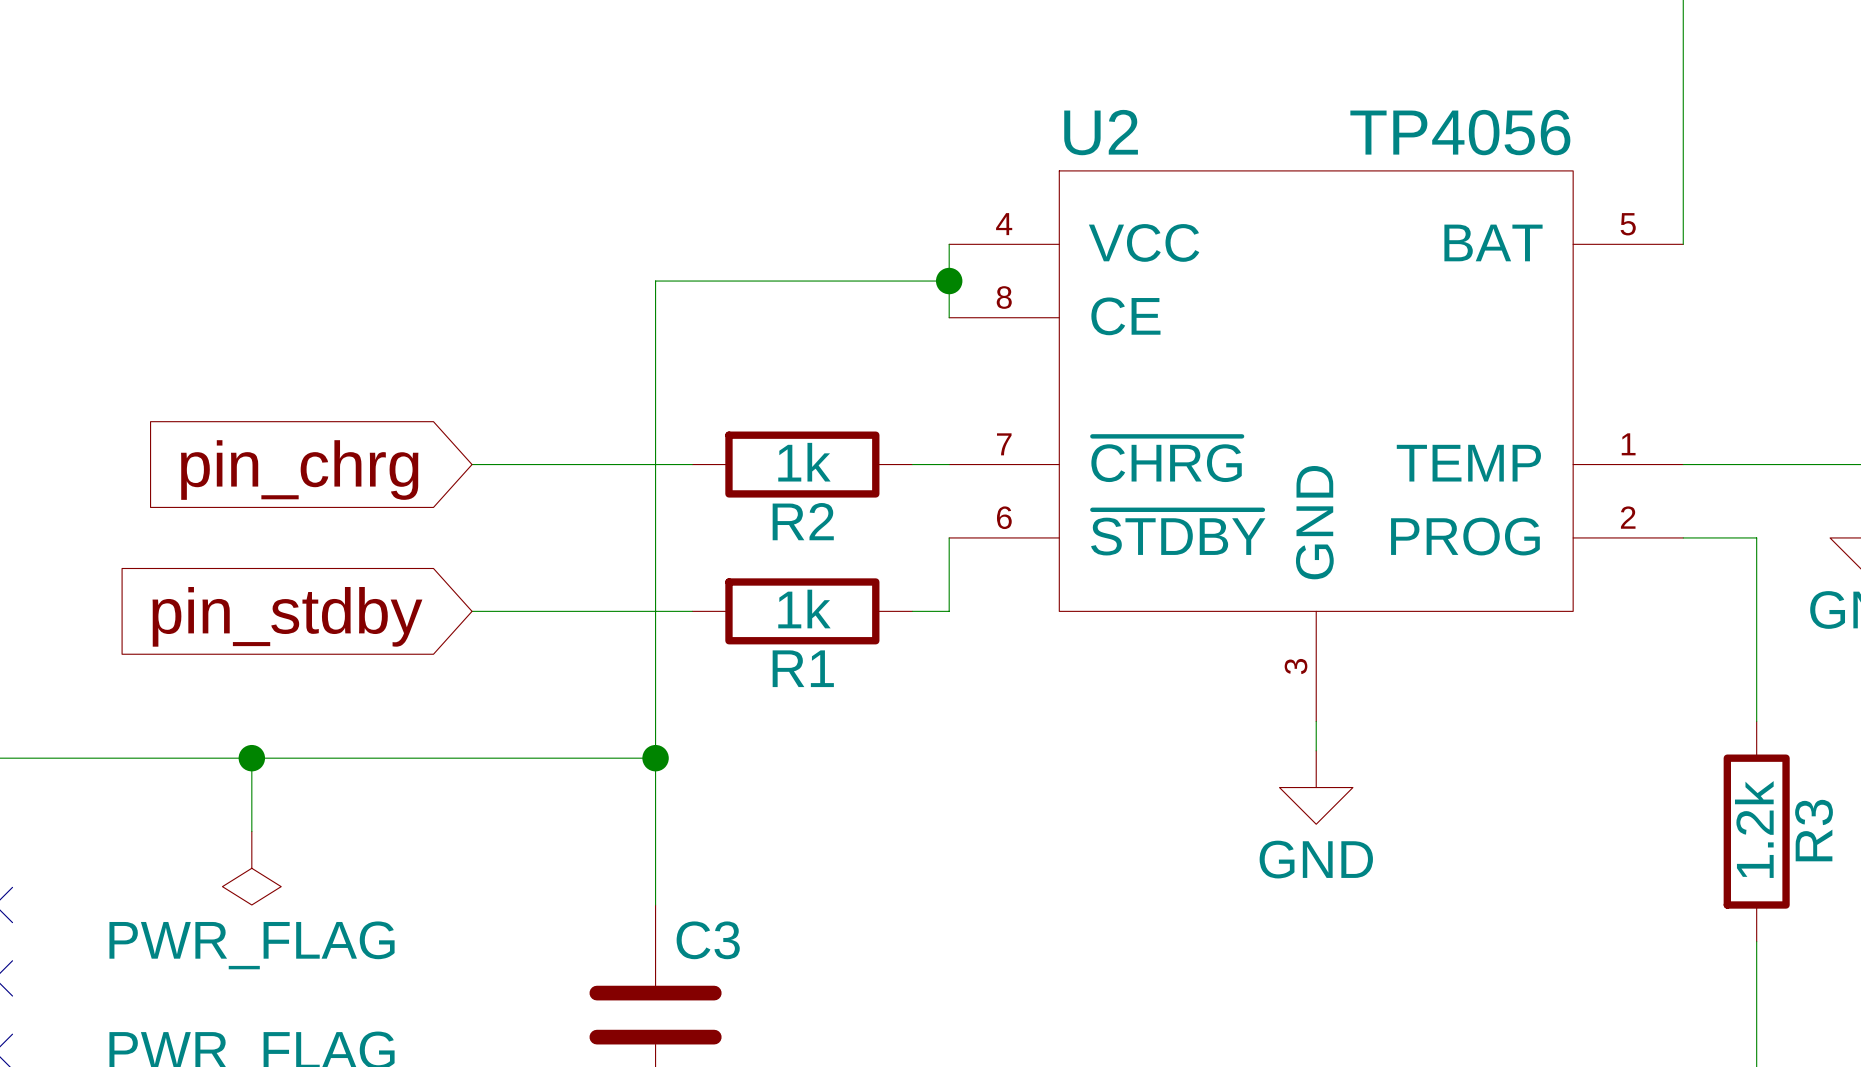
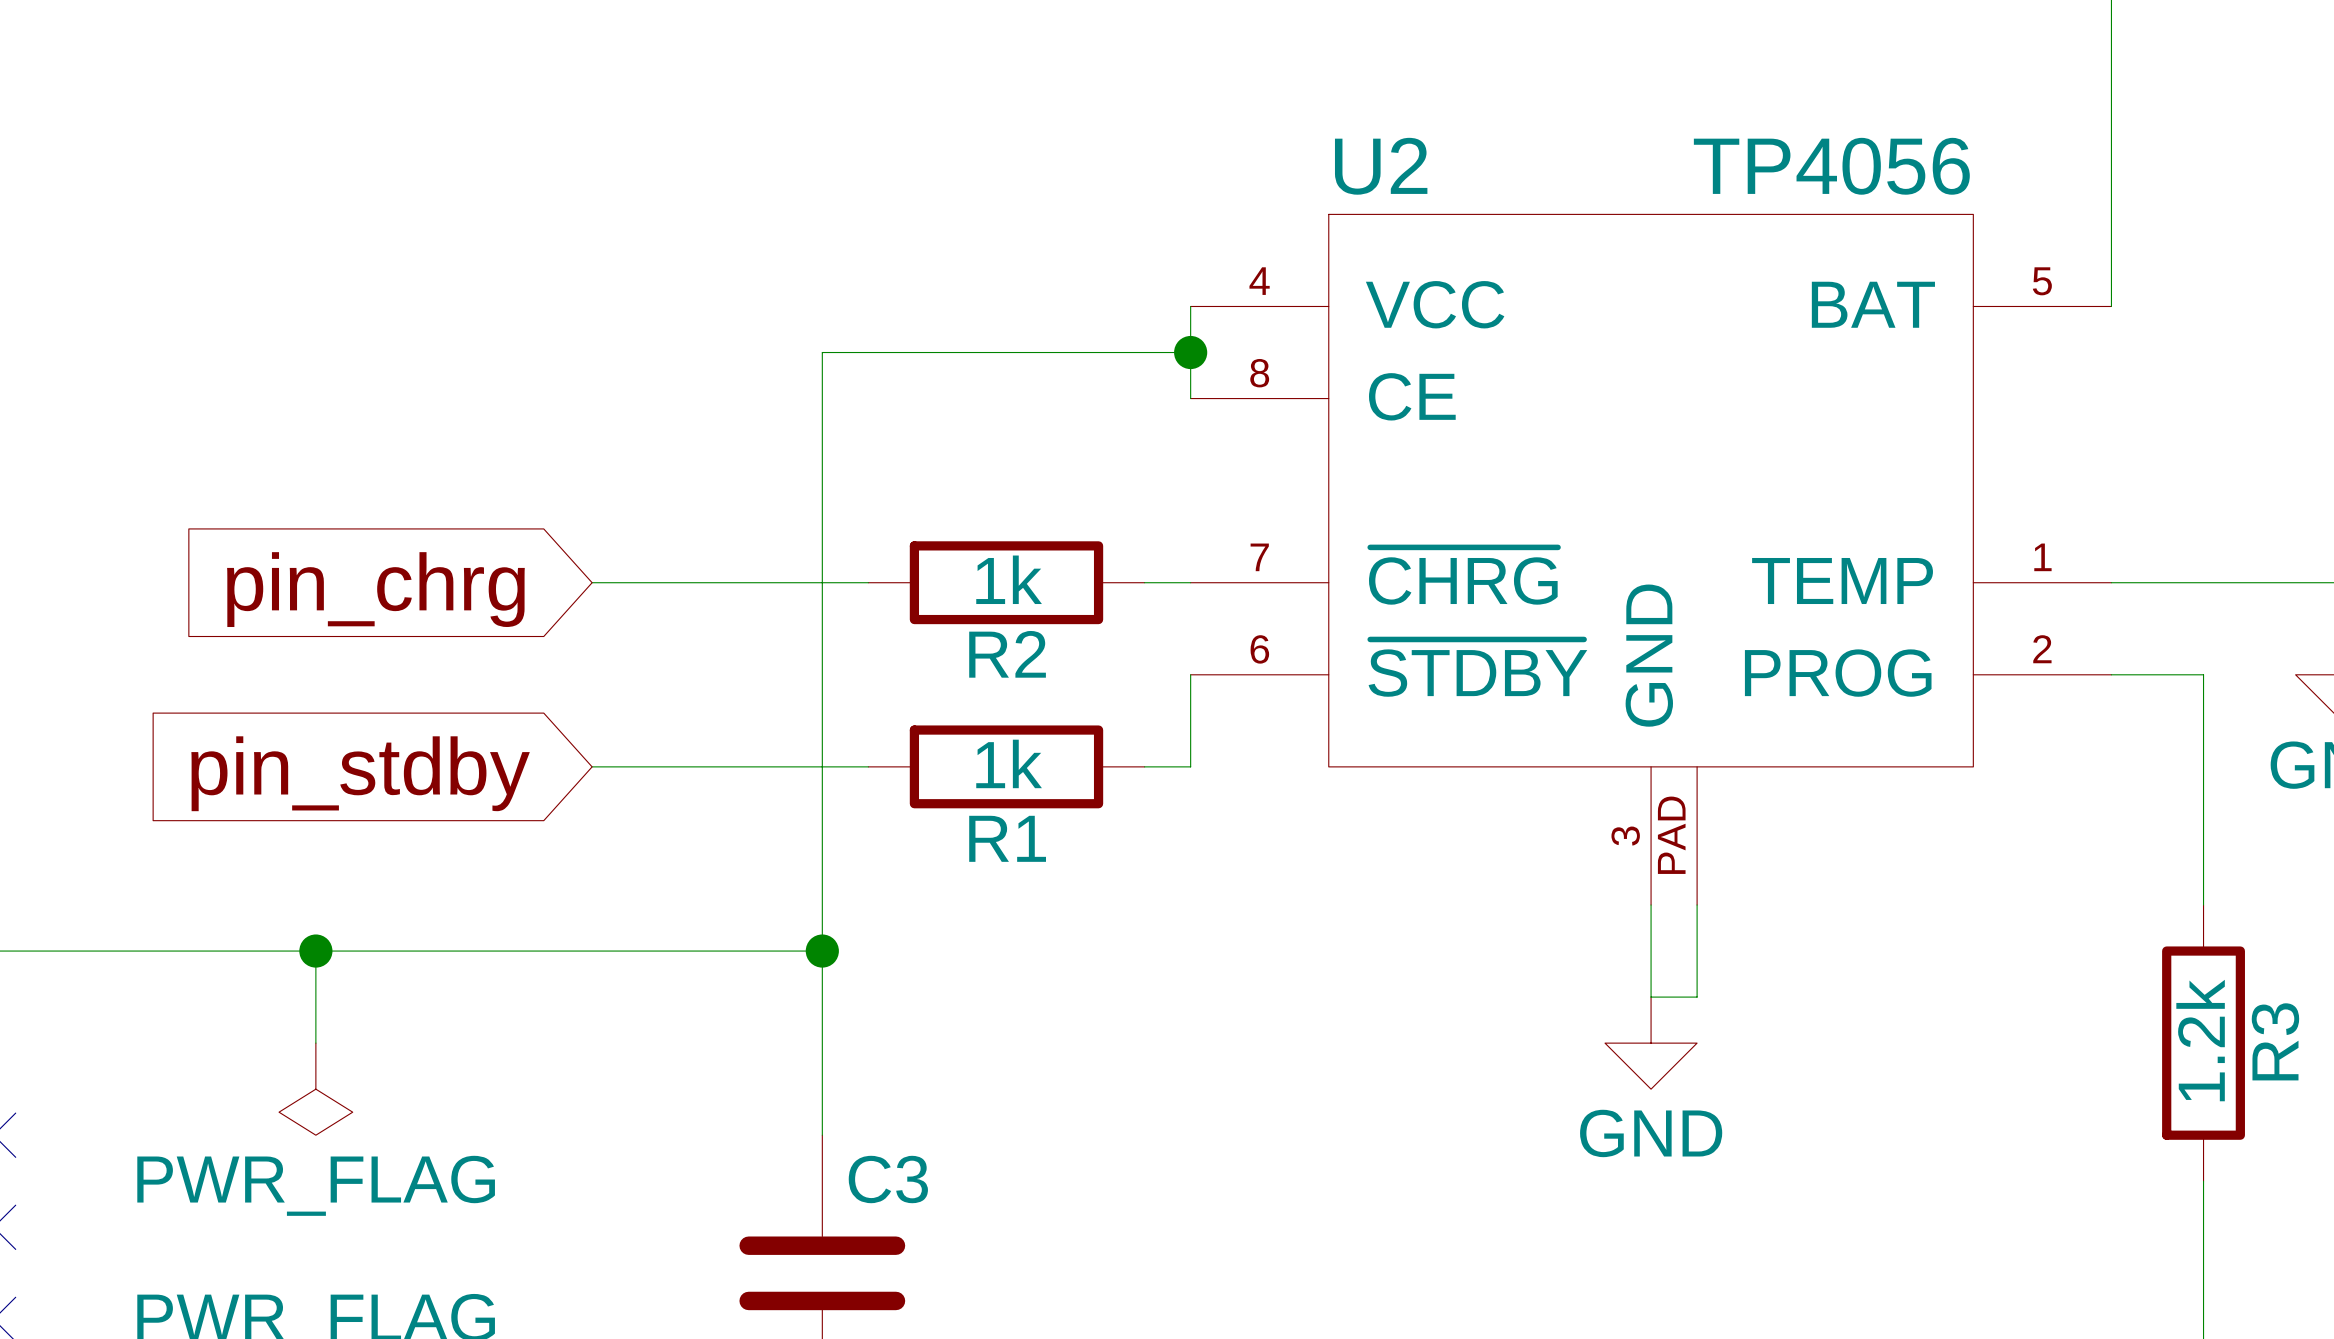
U2 symbol: [949, 170, 1684, 722] -> [1190, 214, 2112, 906]
wire: none -> (1697, 905) (1697, 997) (1651, 997) (1651, 941)
power symbol position: GND (1316, 787) -> GND (1651, 1043)

